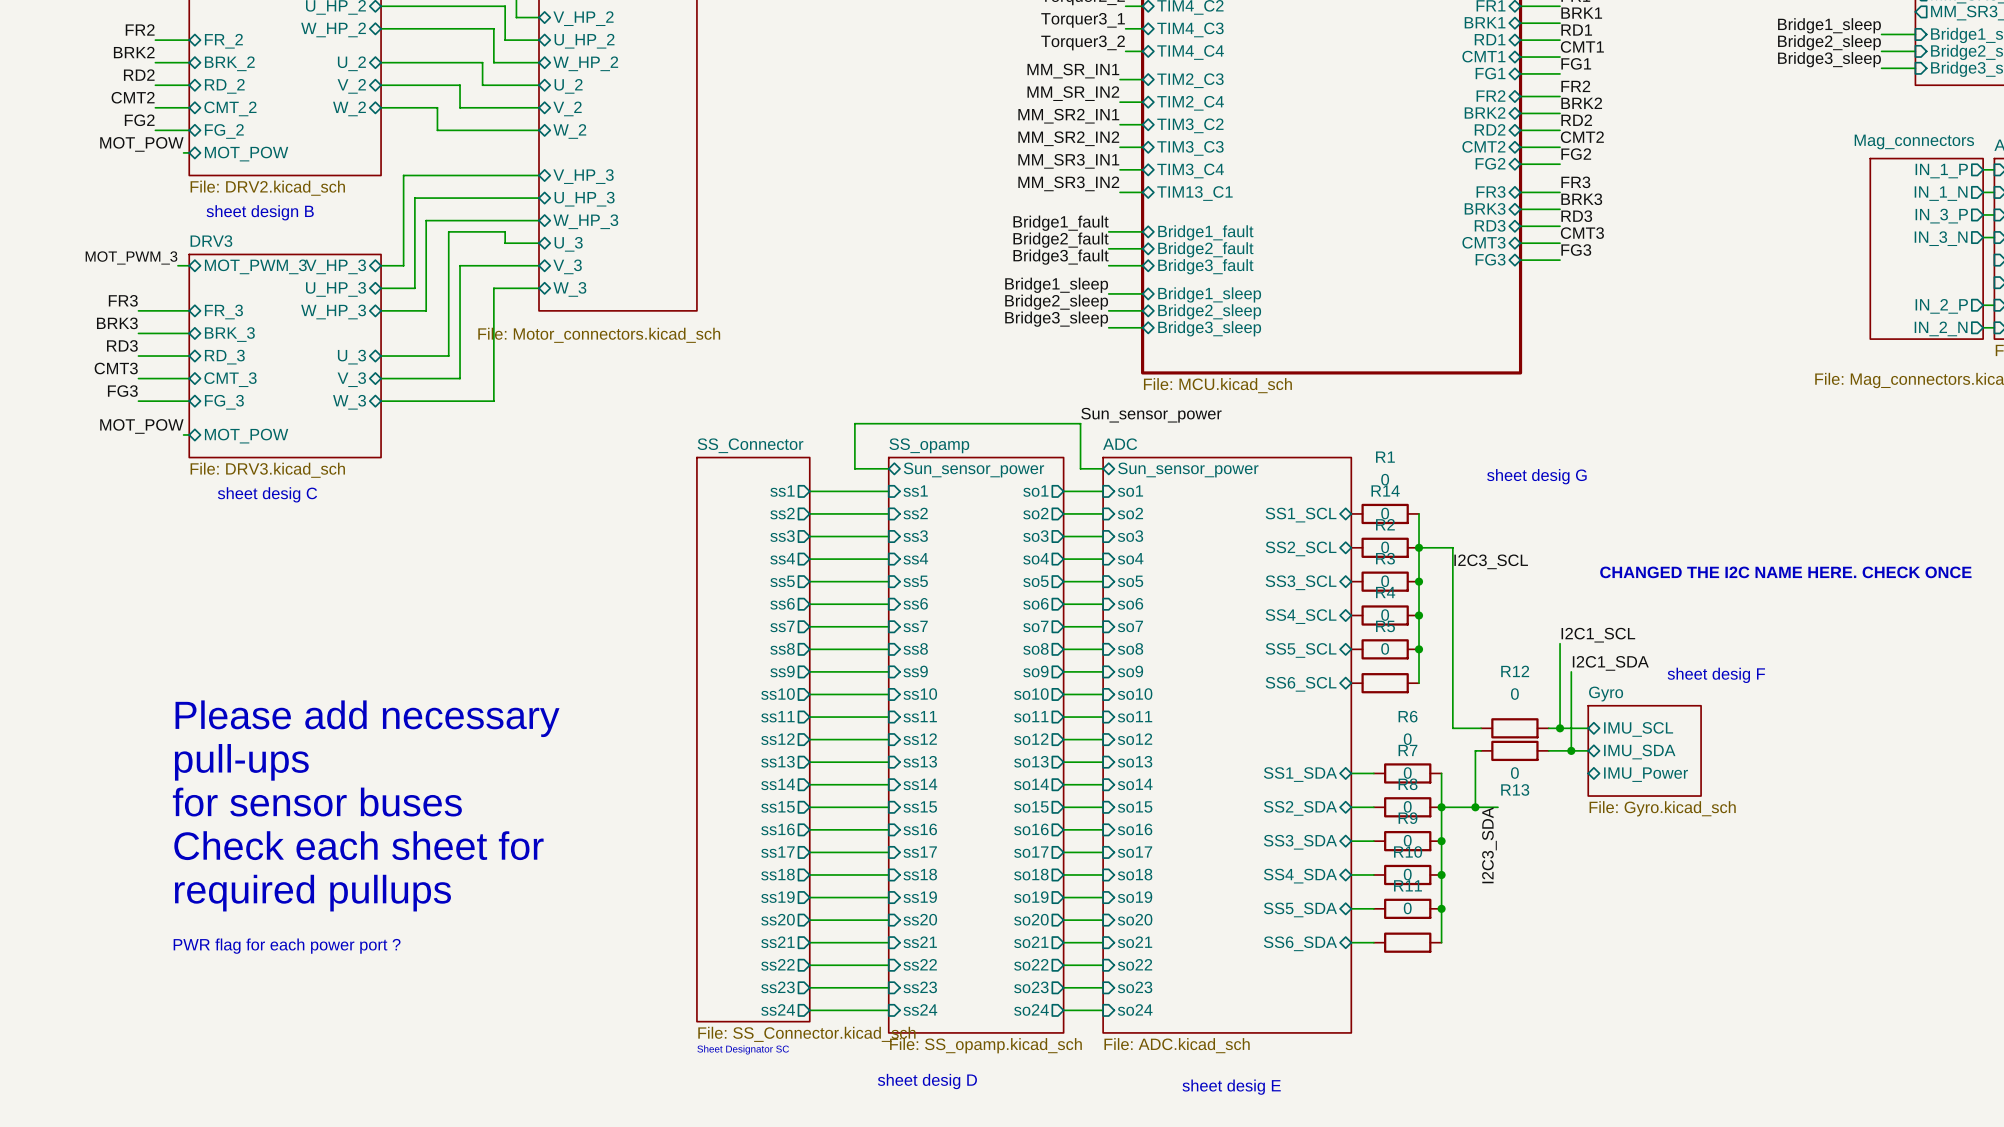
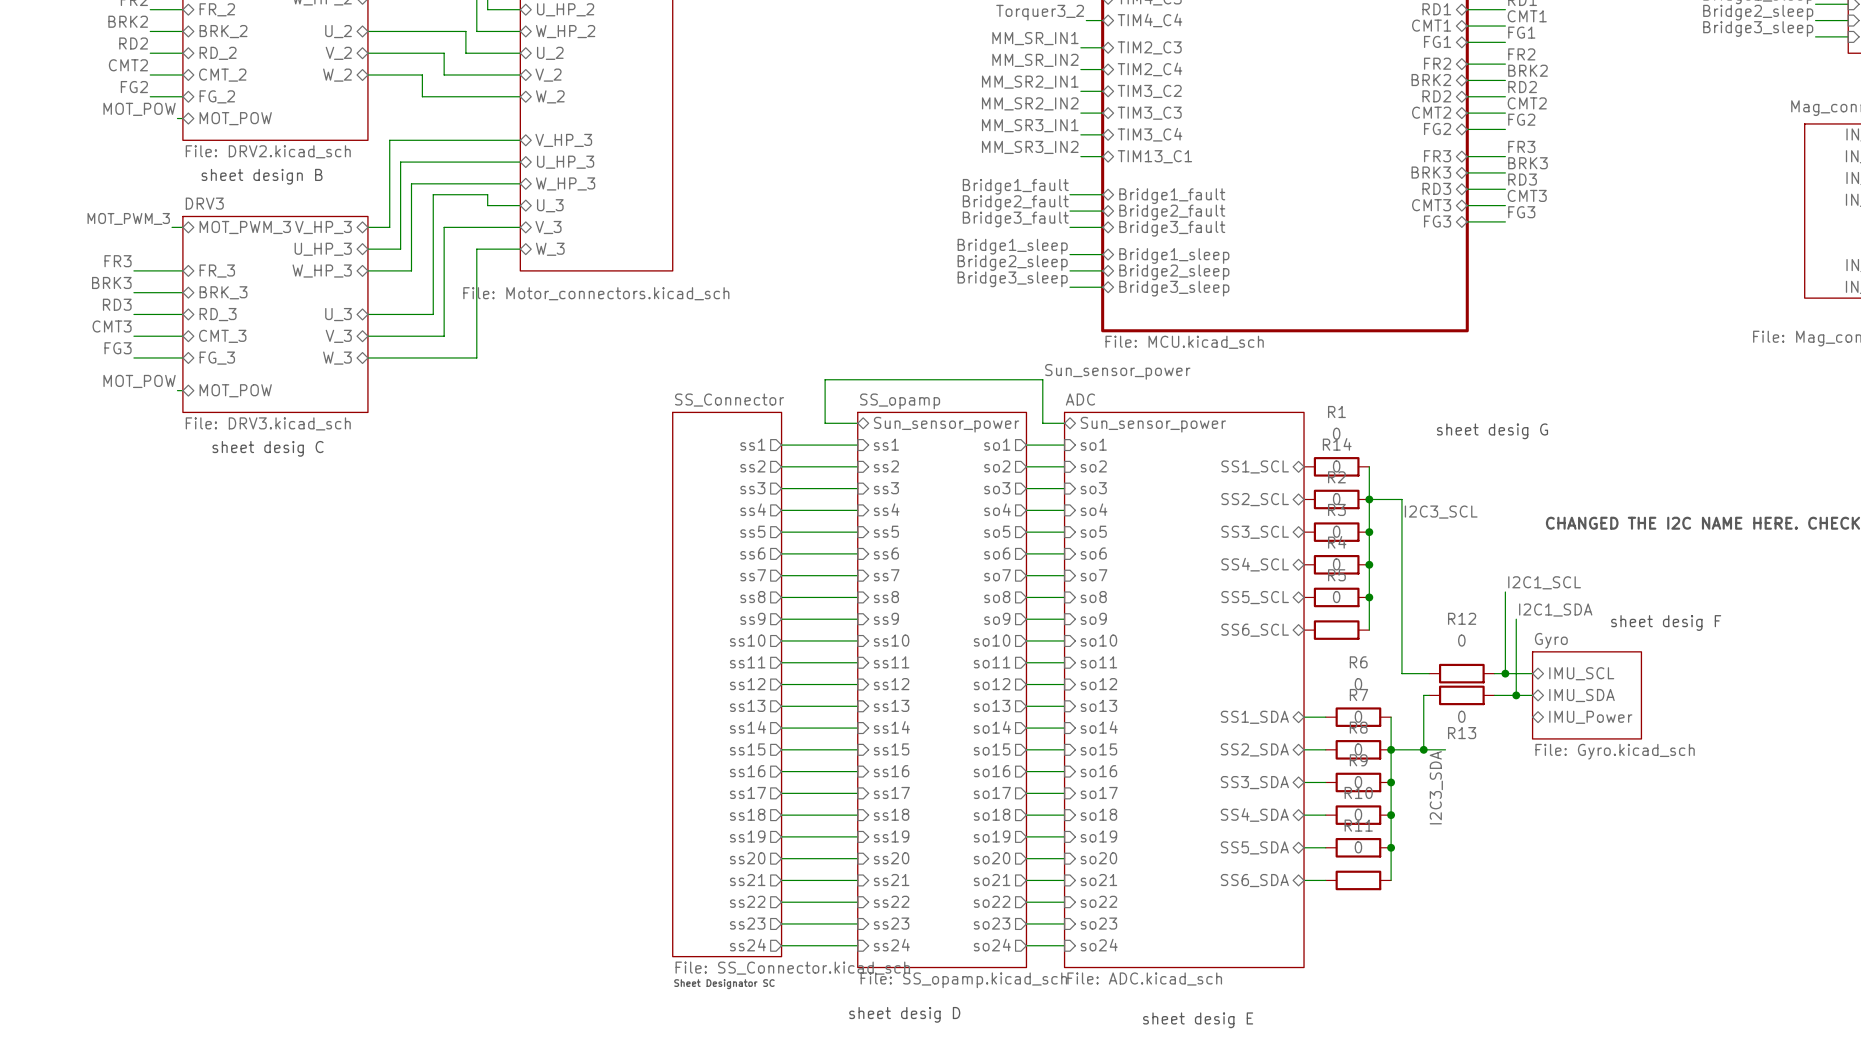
text: Please add necessary (367, 718) -> none
text: pull-ups (241, 762) -> none
text: for sensor buses (317, 802) -> none
text: Check each sheet for (358, 845) -> none
text: required pullups (312, 893) -> none
text: PWR flag for each power port ? (287, 946) -> none

